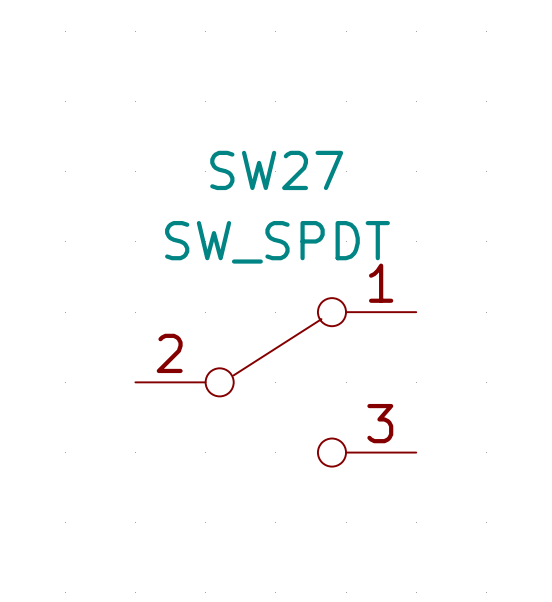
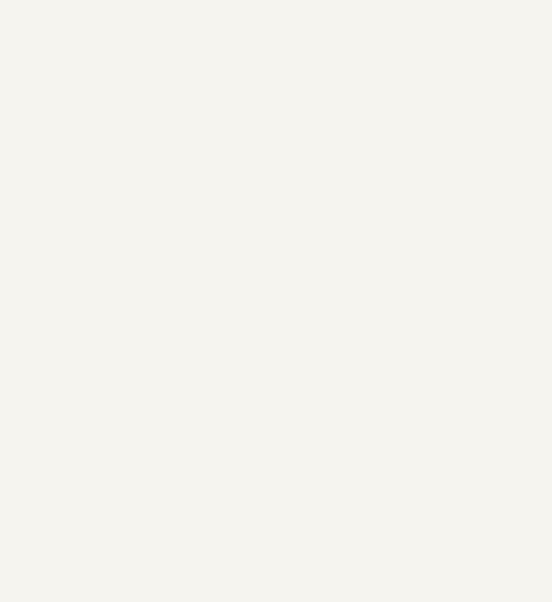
SW27: SW_SPDT (275, 382) -> none

